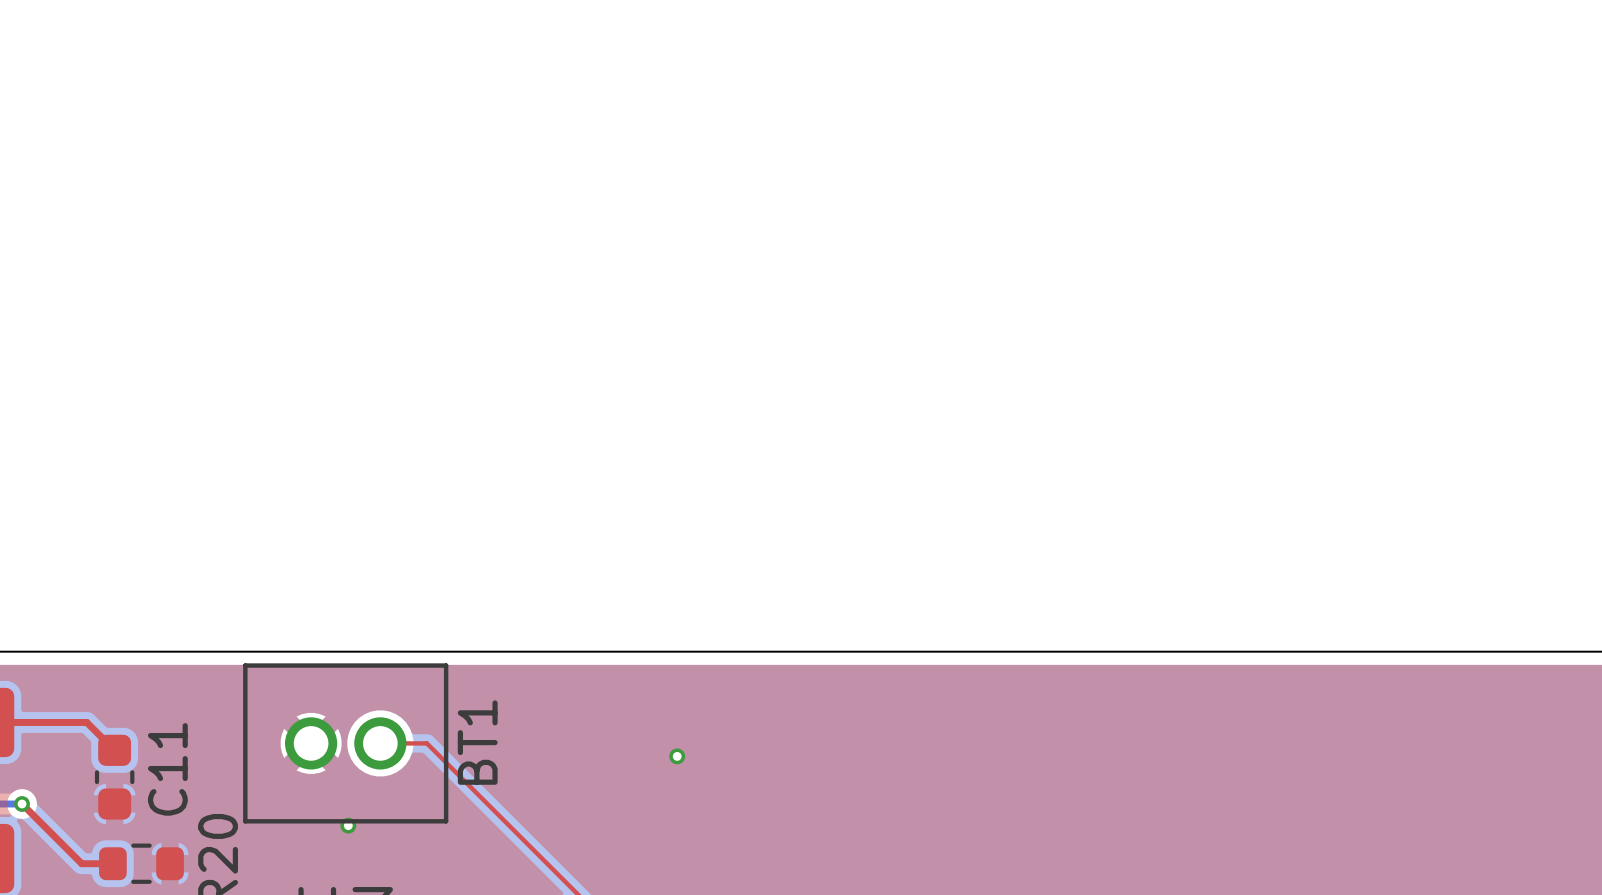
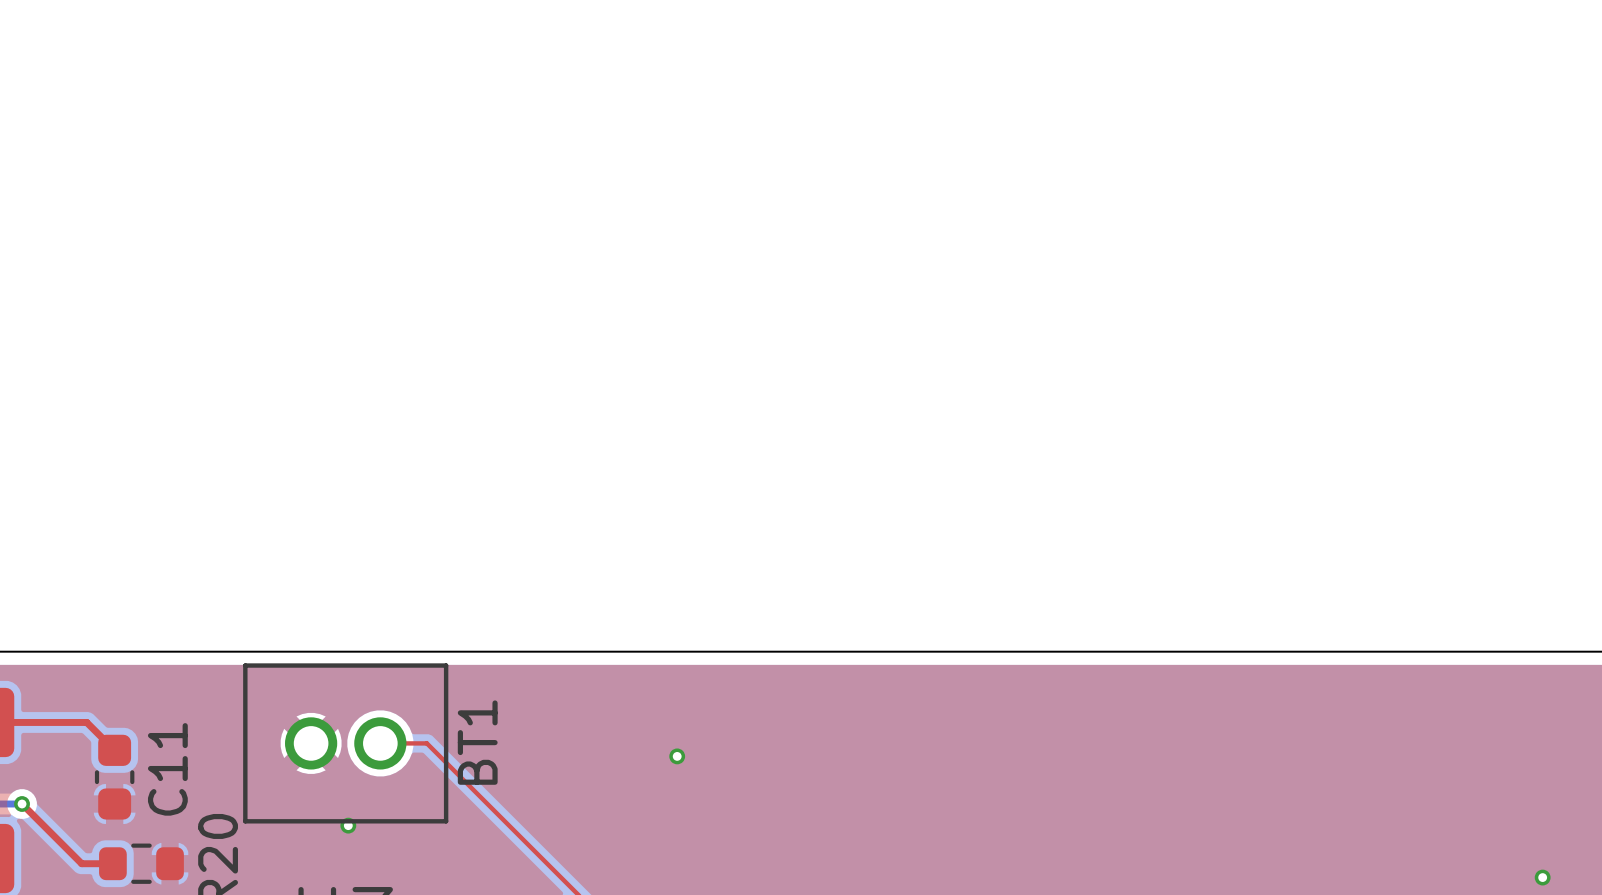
via: none -> (1542, 877)

